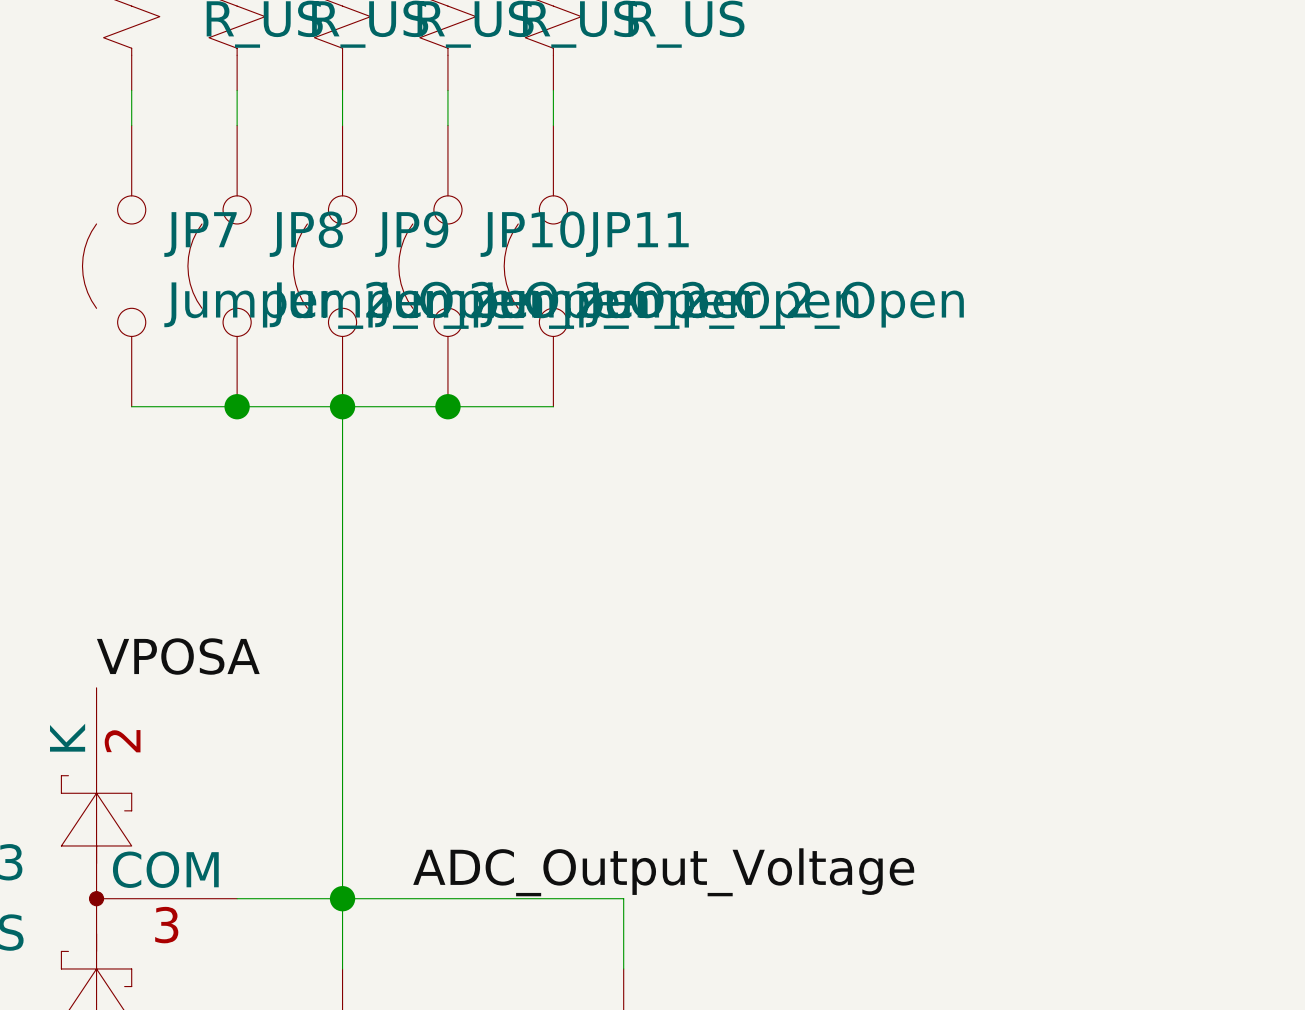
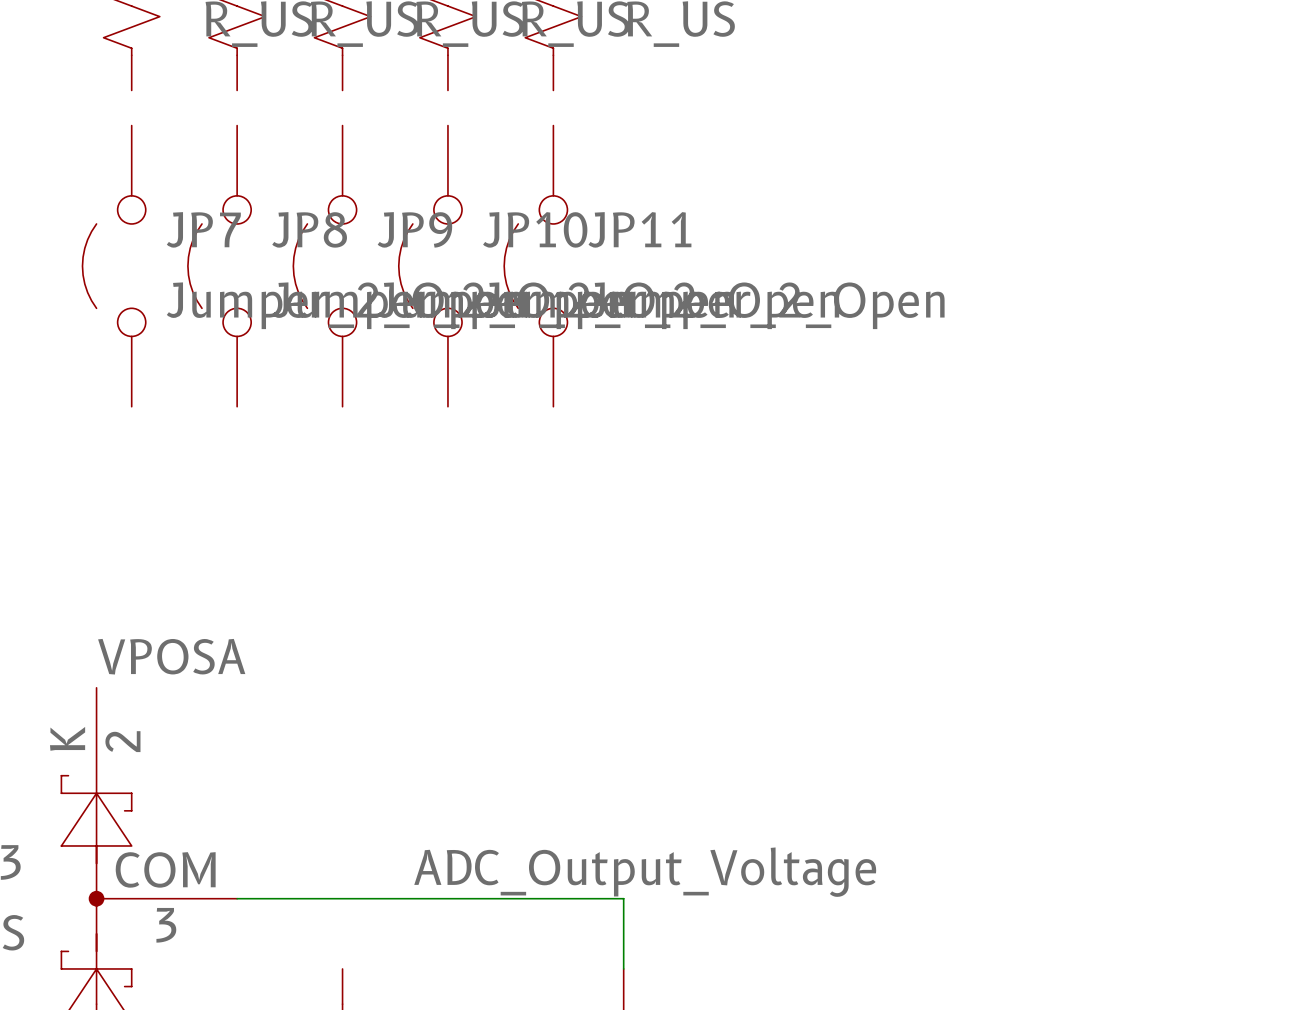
wire: (131, 90) (131, 125) -> none
wire: (237, 90) (237, 125) -> none
wire: (342, 90) (342, 125) -> none
wire: (447, 90) (447, 125) -> none
wire: (553, 90) (553, 125) -> none
wire: (131, 406) (553, 406) -> none
junction: (237, 406) -> none
wire: (342, 406) (342, 968) -> none
junction: (342, 406) -> none
junction: (447, 406) -> none
junction: (342, 898) -> none

